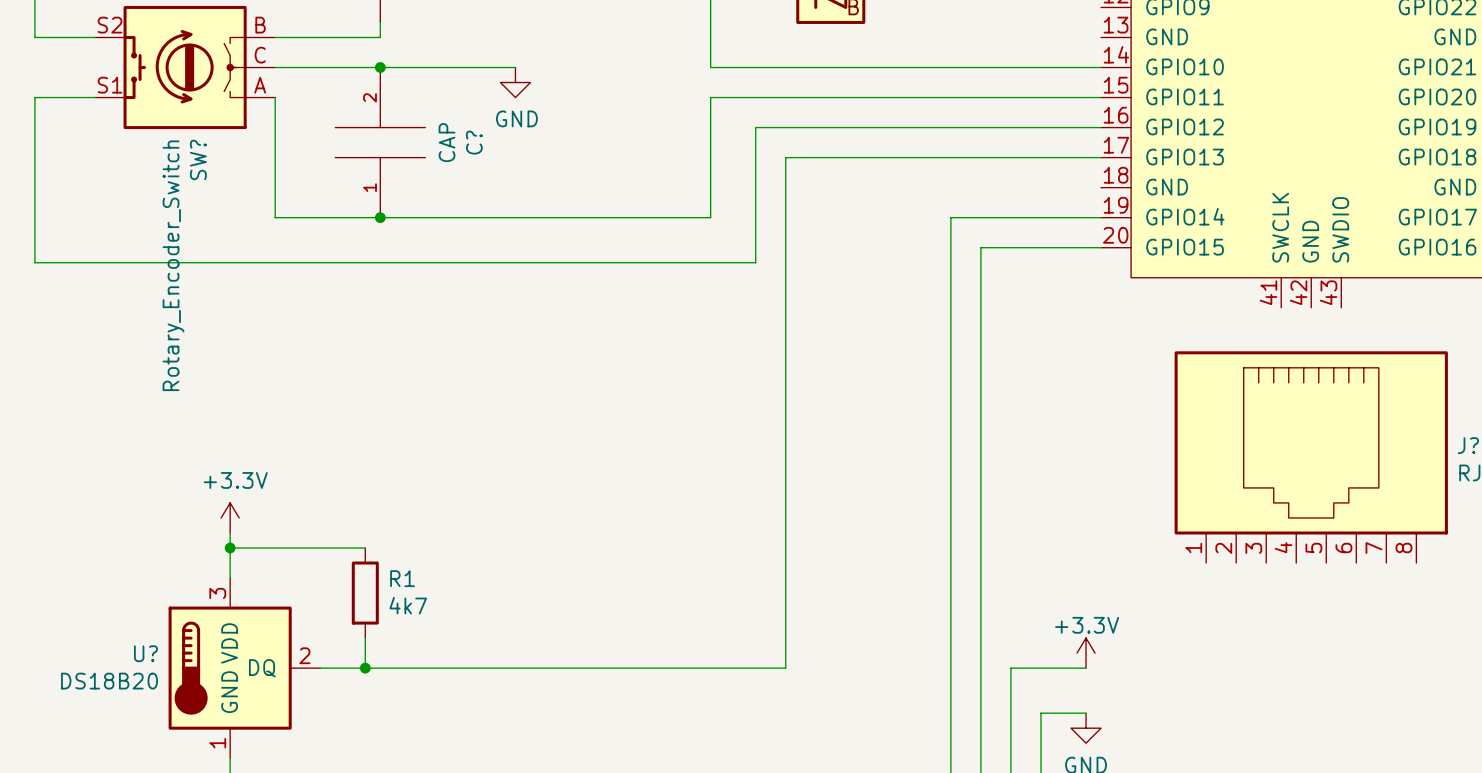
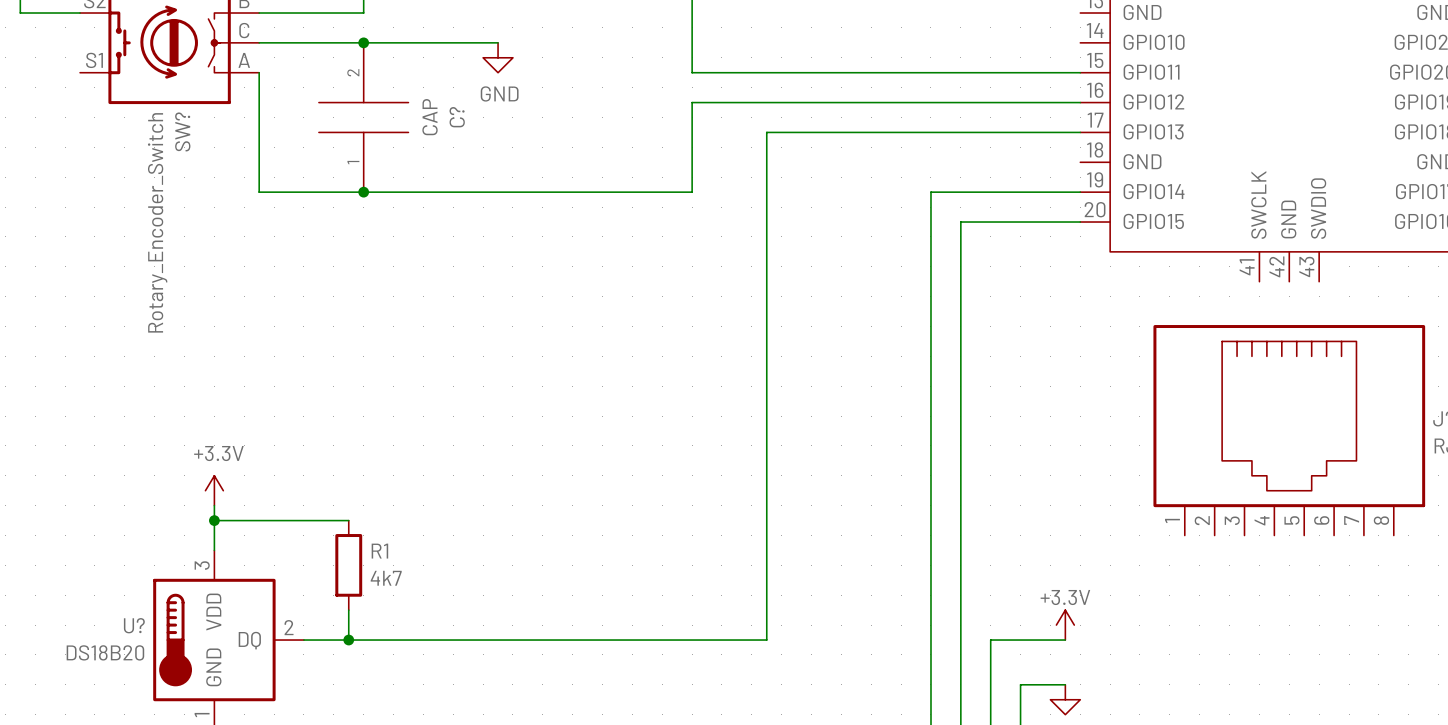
wire: (710, 67) (1101, 67) -> (692, 42) (692, 72)
wire: (95, 97) (34, 97) (34, 262) (755, 262) (755, 127) -> none
wire: (710, 97) (710, 127) -> (736, 102) (692, 102)

